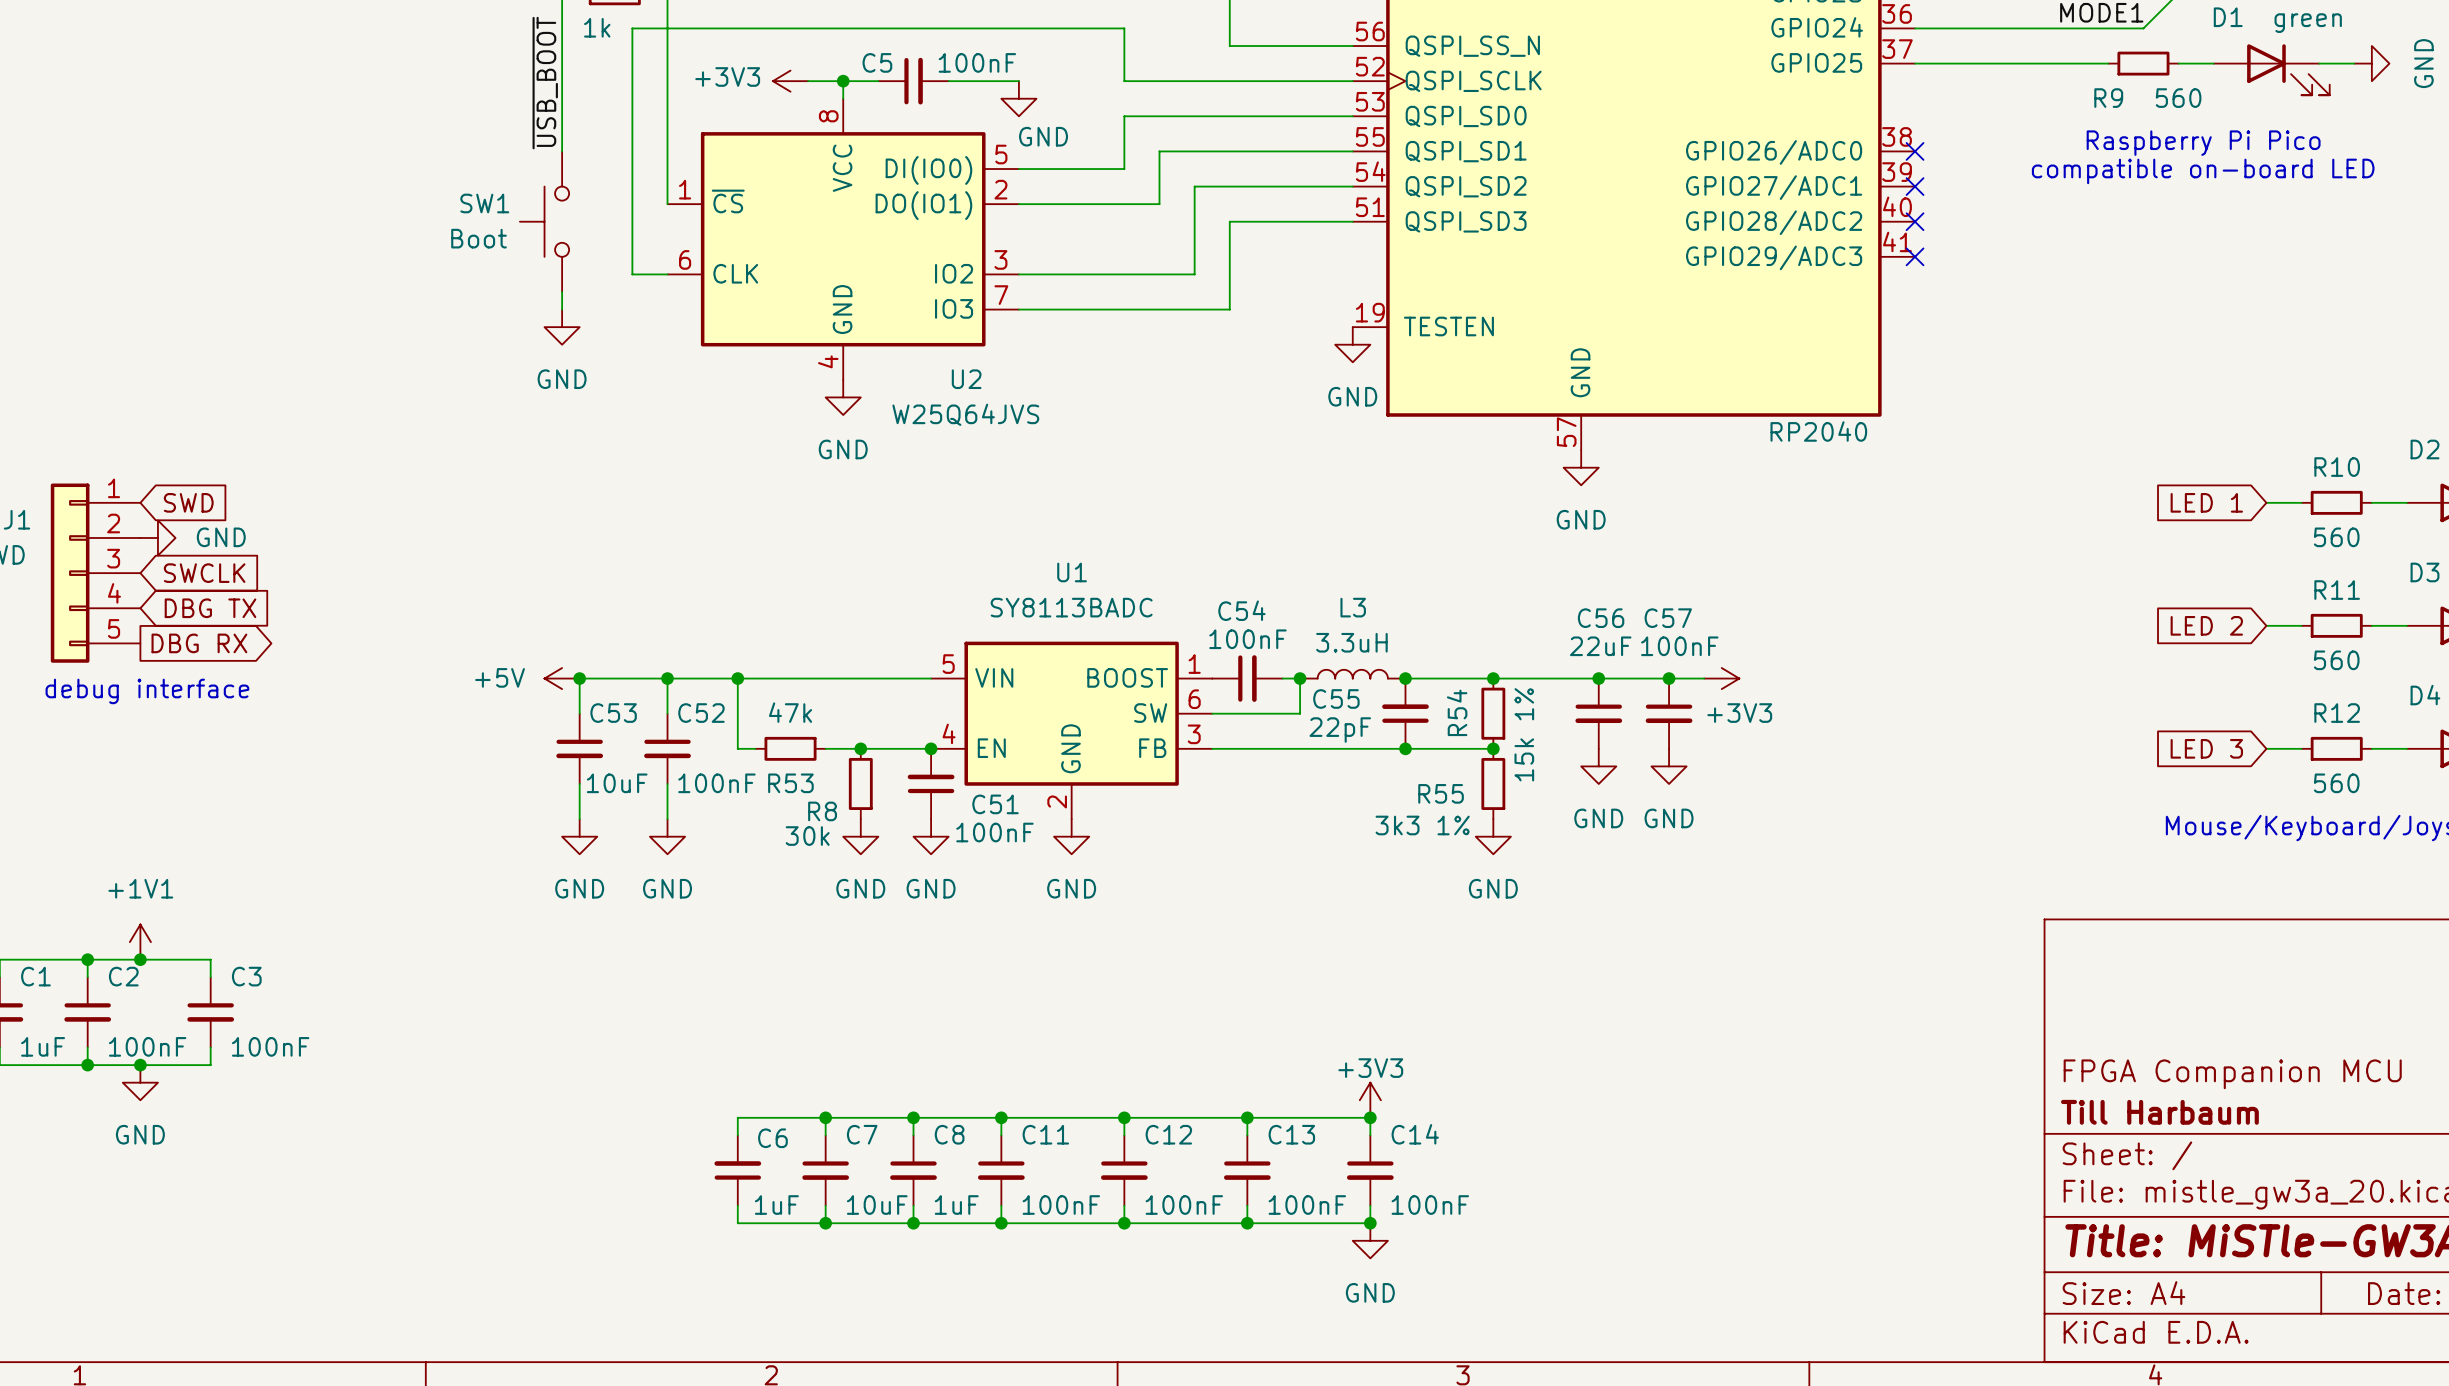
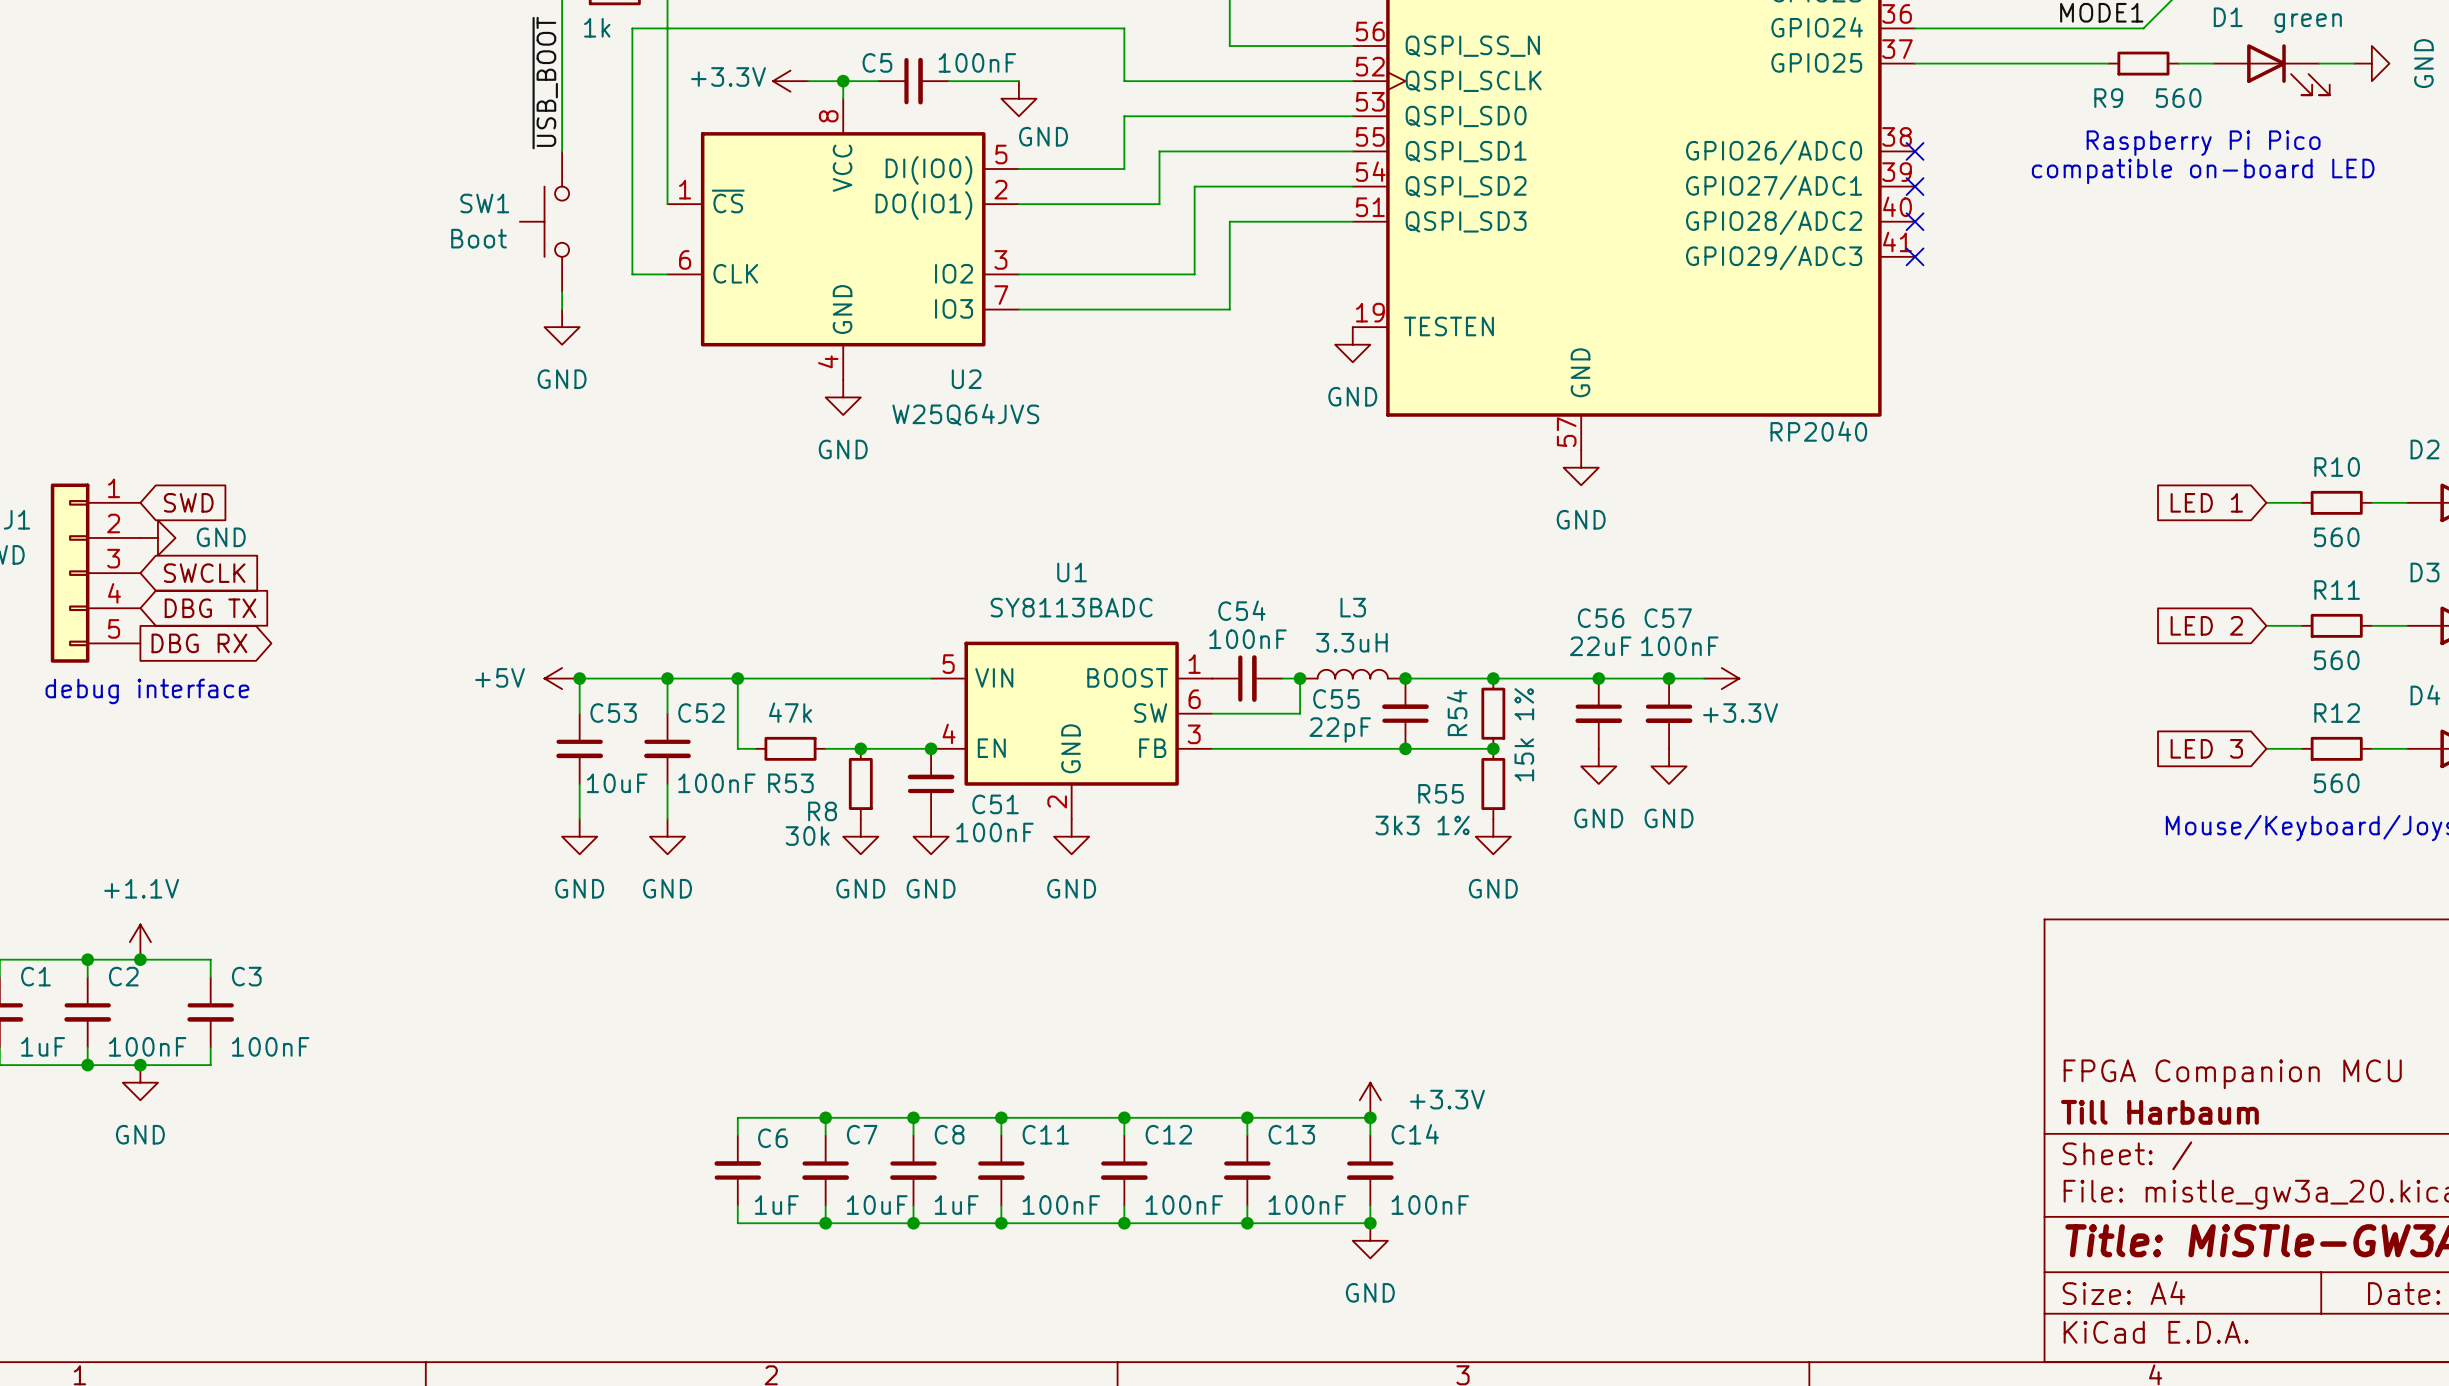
power symbol: +3V3 (790, 81) -> +3.3V (790, 81)
power symbol: +3V3 (1721, 678) -> +3.3V (1721, 678)
power symbol: +1V1 (140, 942) -> +1.1V (140, 942)
power symbol: +3V3 (1370, 1100) -> +3.3V (1370, 1100)

